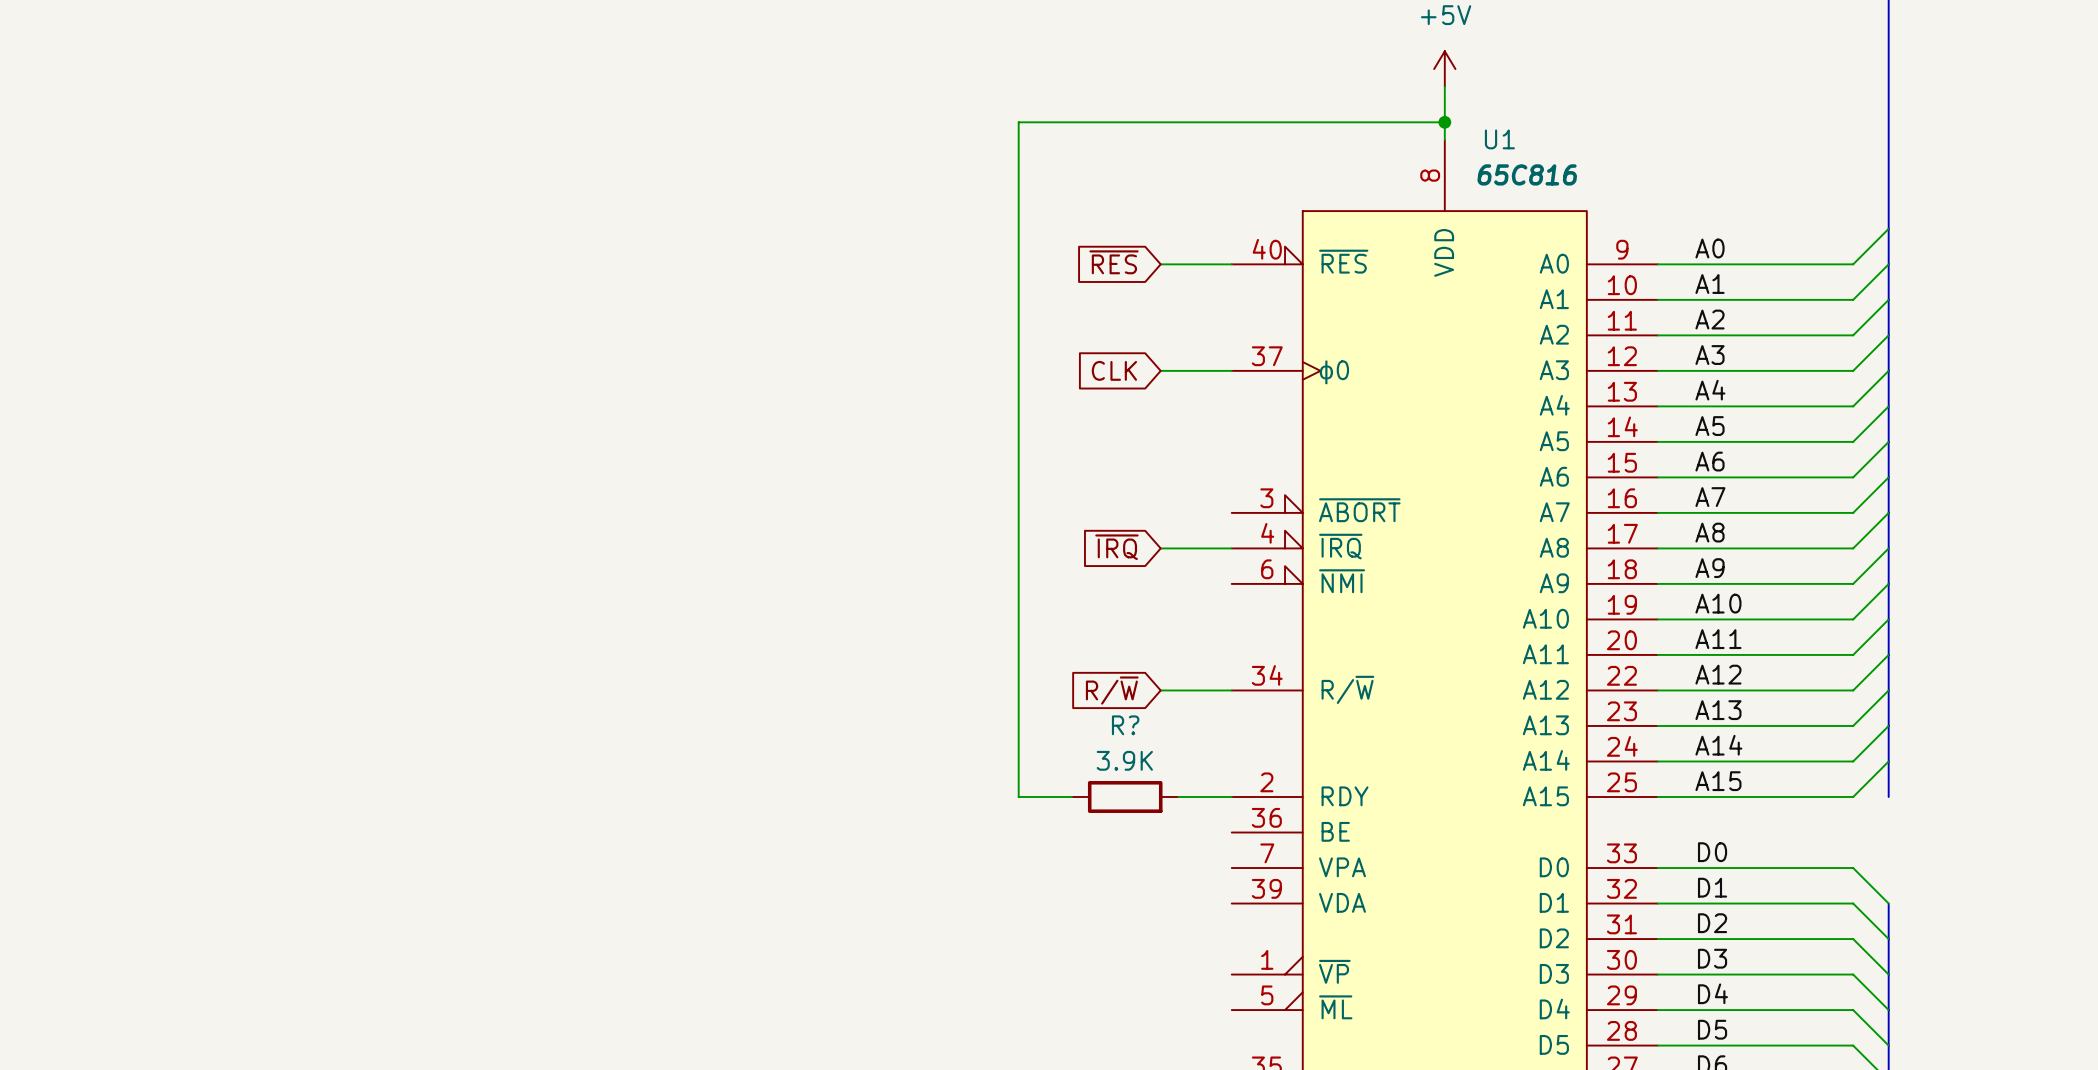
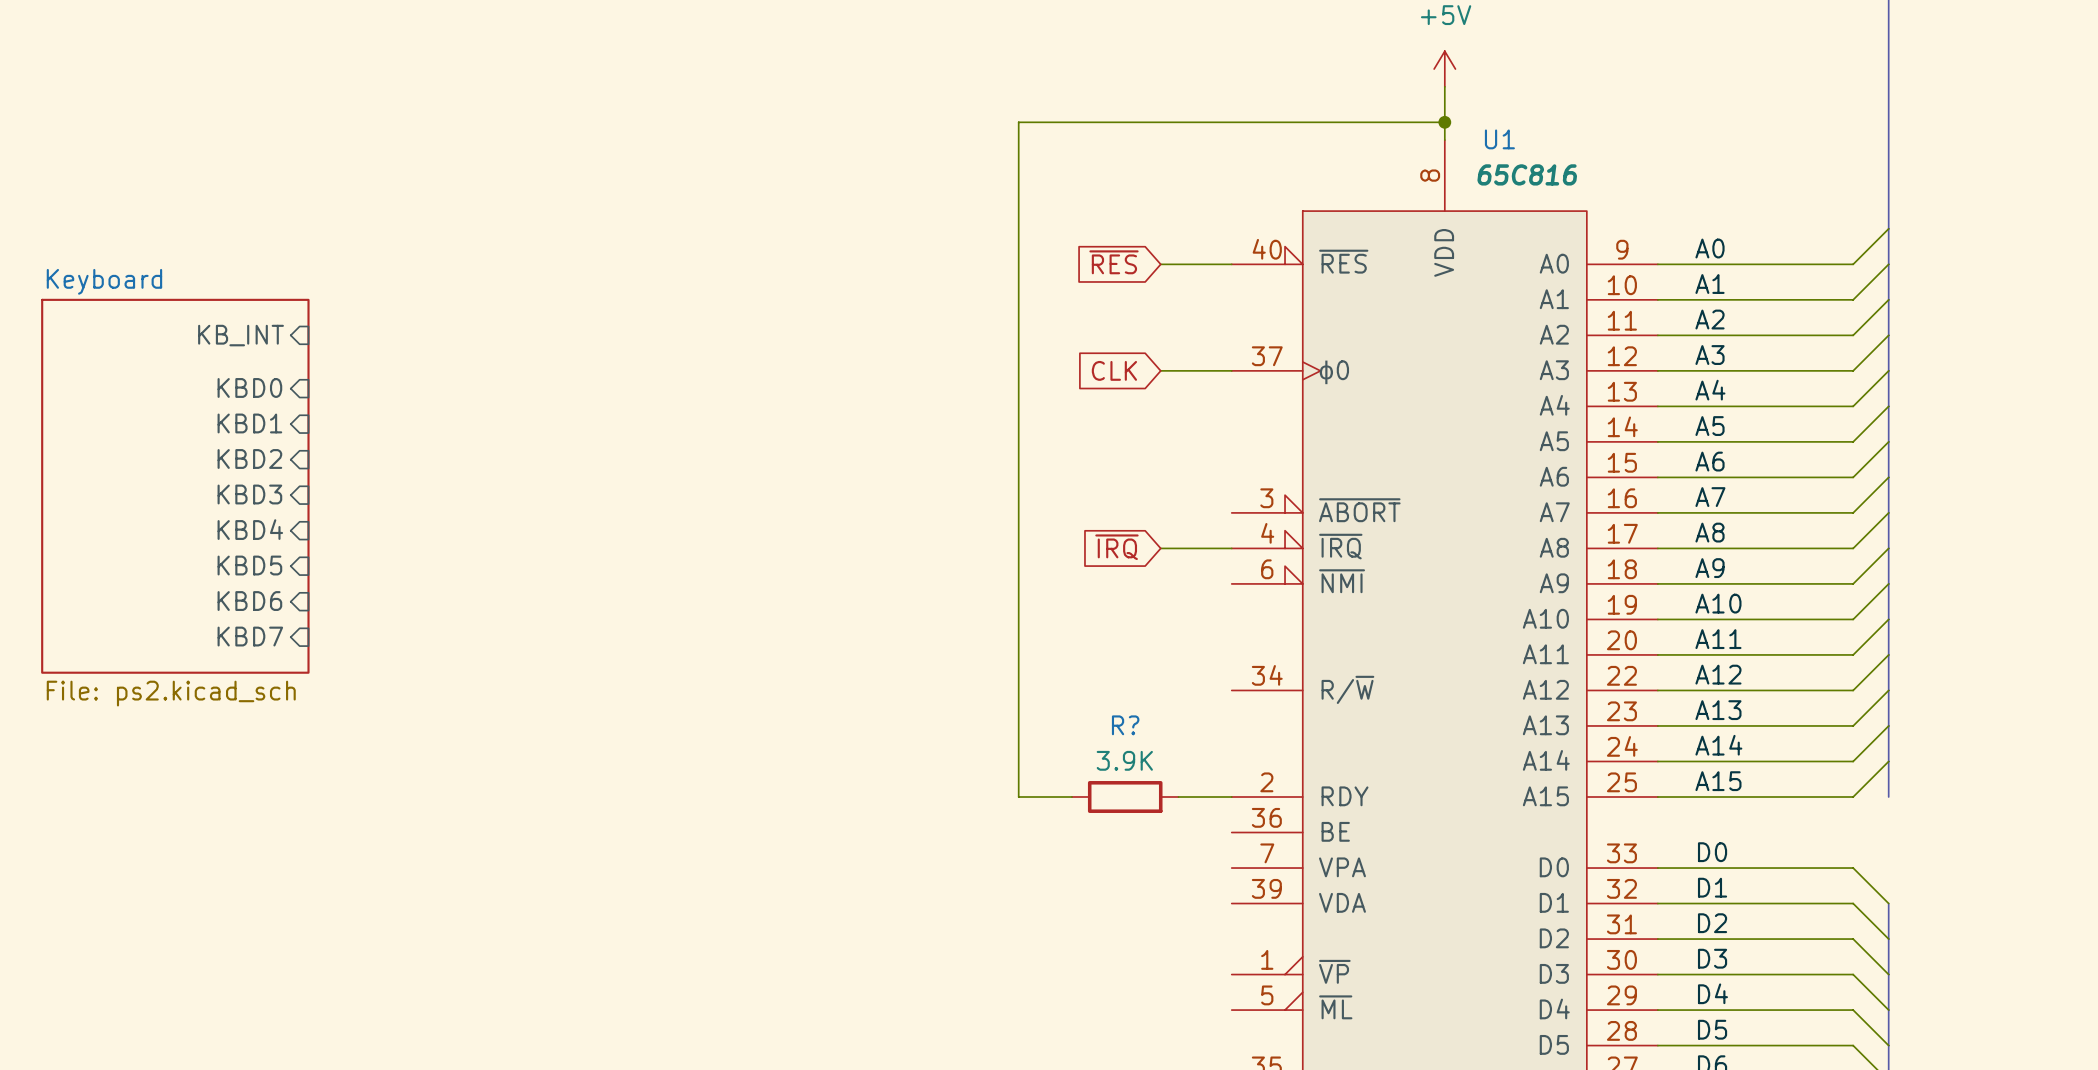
sheet pin: none -> KB_INT (241, 335)
sheet pin: none -> KBD0 (249, 387)
sheet pin: none -> KBD1 (249, 423)
sheet pin: none -> KBD2 (249, 458)
sheet Keyboard: none -> File: ps2.kicad_sch (175, 486)
sheet pin: none -> KBD3 (249, 494)
sheet pin: none -> KBD4 (250, 529)
sheet pin: none -> KBD5 (249, 565)
sheet pin: none -> KBD6 (249, 601)
sheet pin: none -> KBD7 (250, 636)
global label: R/~{W} (1112, 690) -> none
wire: (1160, 690) (1231, 690) -> none

